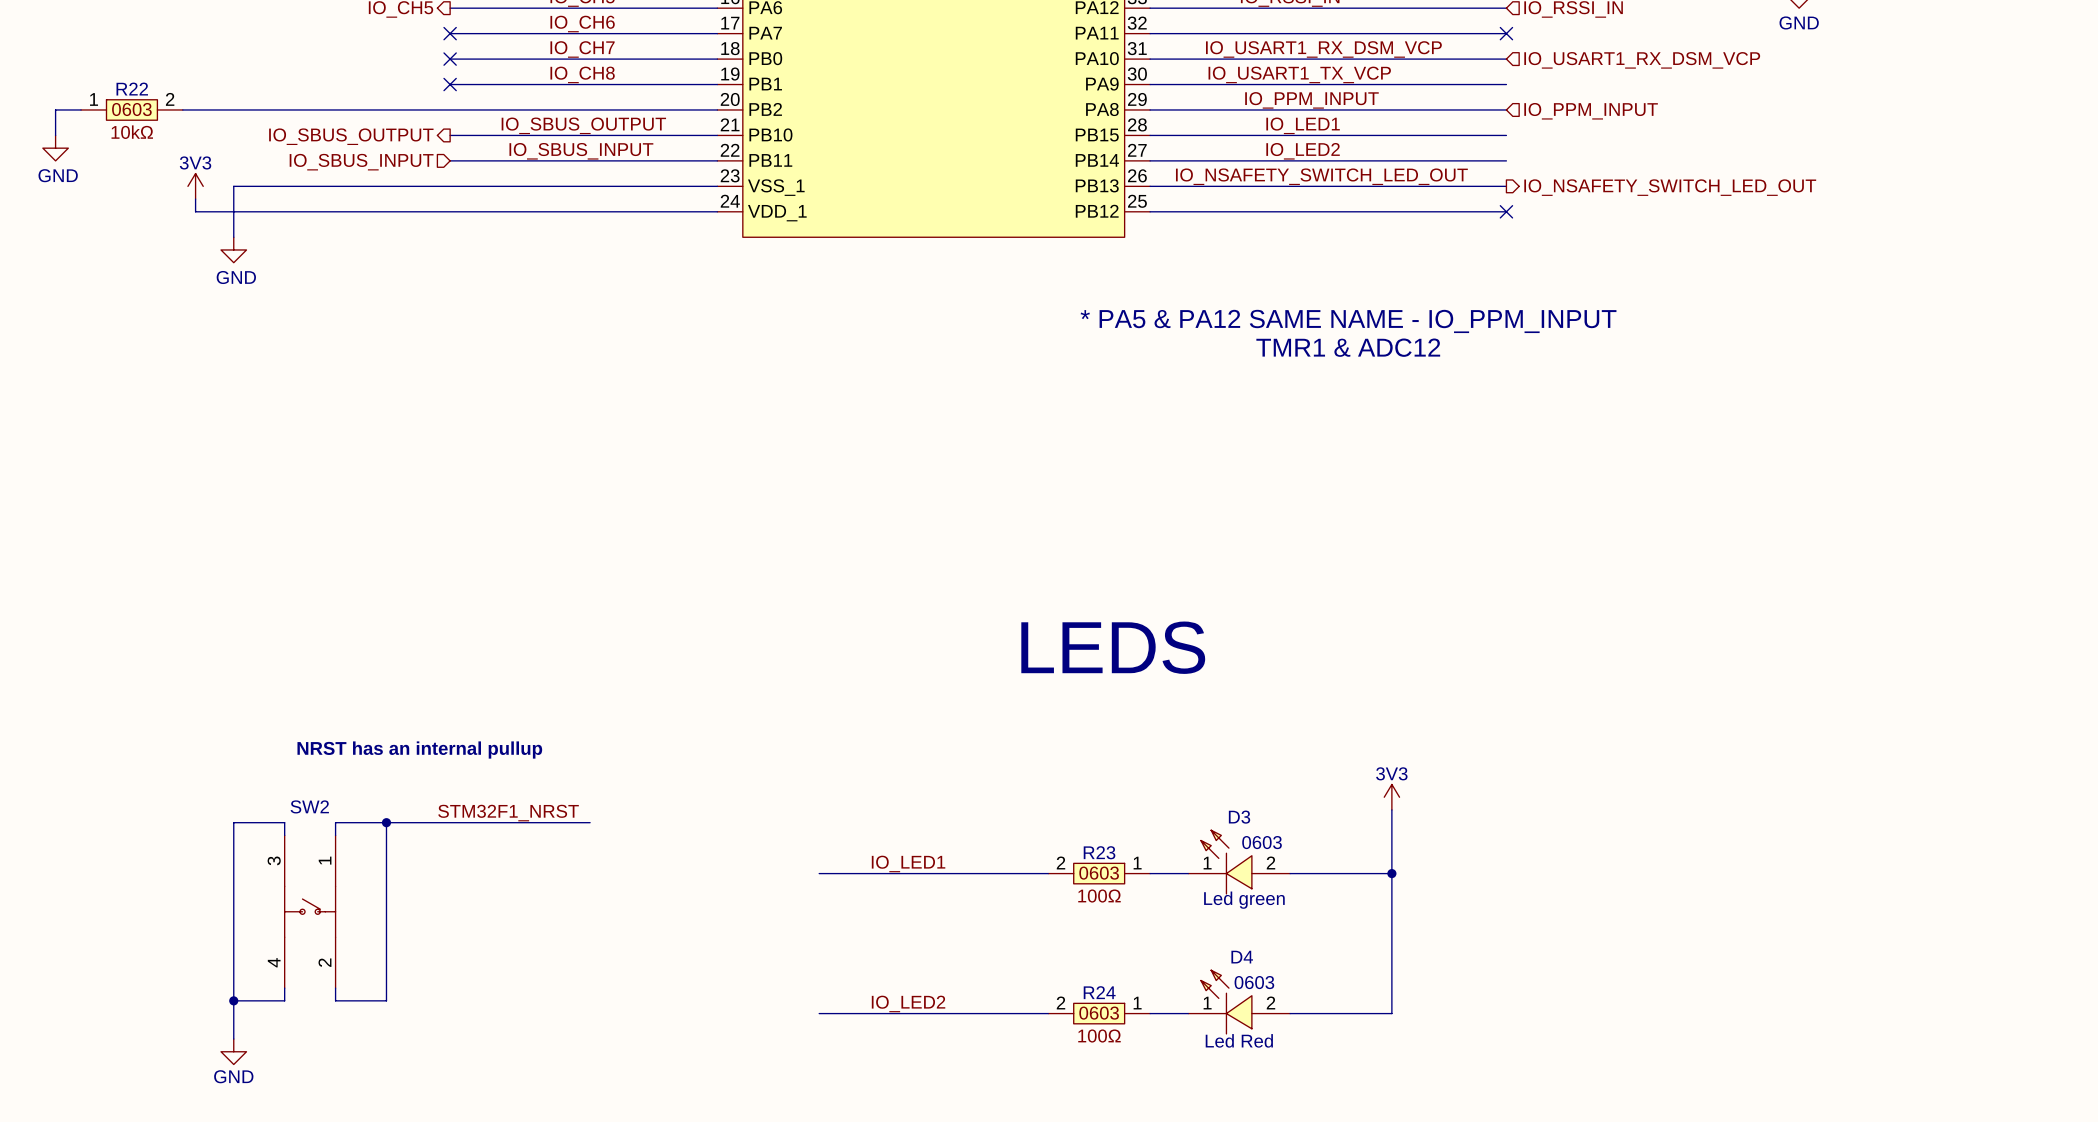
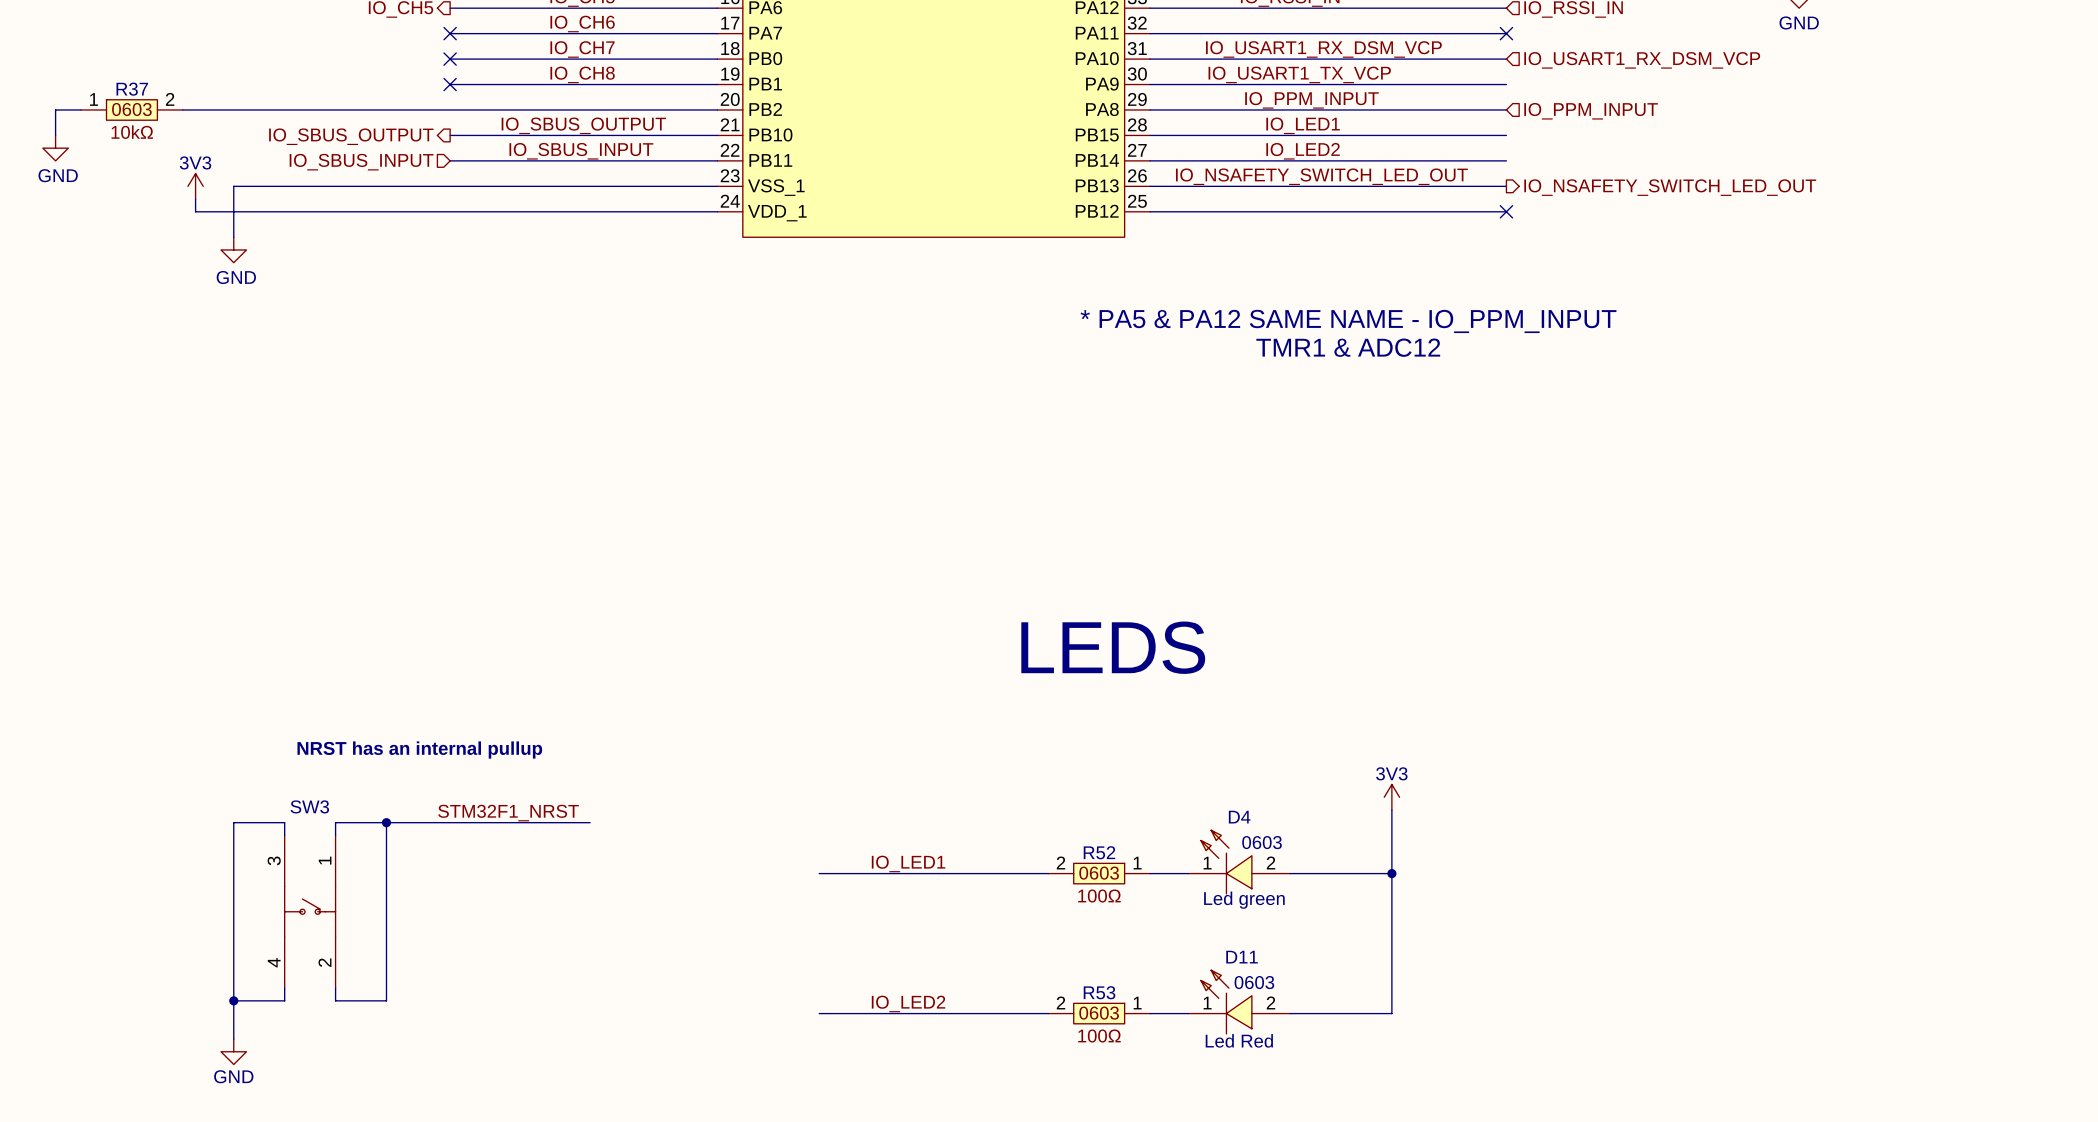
R22 name: R22 (132, 89) -> R37 (132, 89)
SW2 name: SW2 (309, 806) -> SW3 (309, 806)
D3 name: D3 (1239, 817) -> D4 (1239, 817)
R23 name: R23 (1099, 852) -> R52 (1099, 852)
D4 name: D4 (1242, 957) -> D11 (1242, 957)
R24 name: R24 (1099, 992) -> R53 (1099, 992)

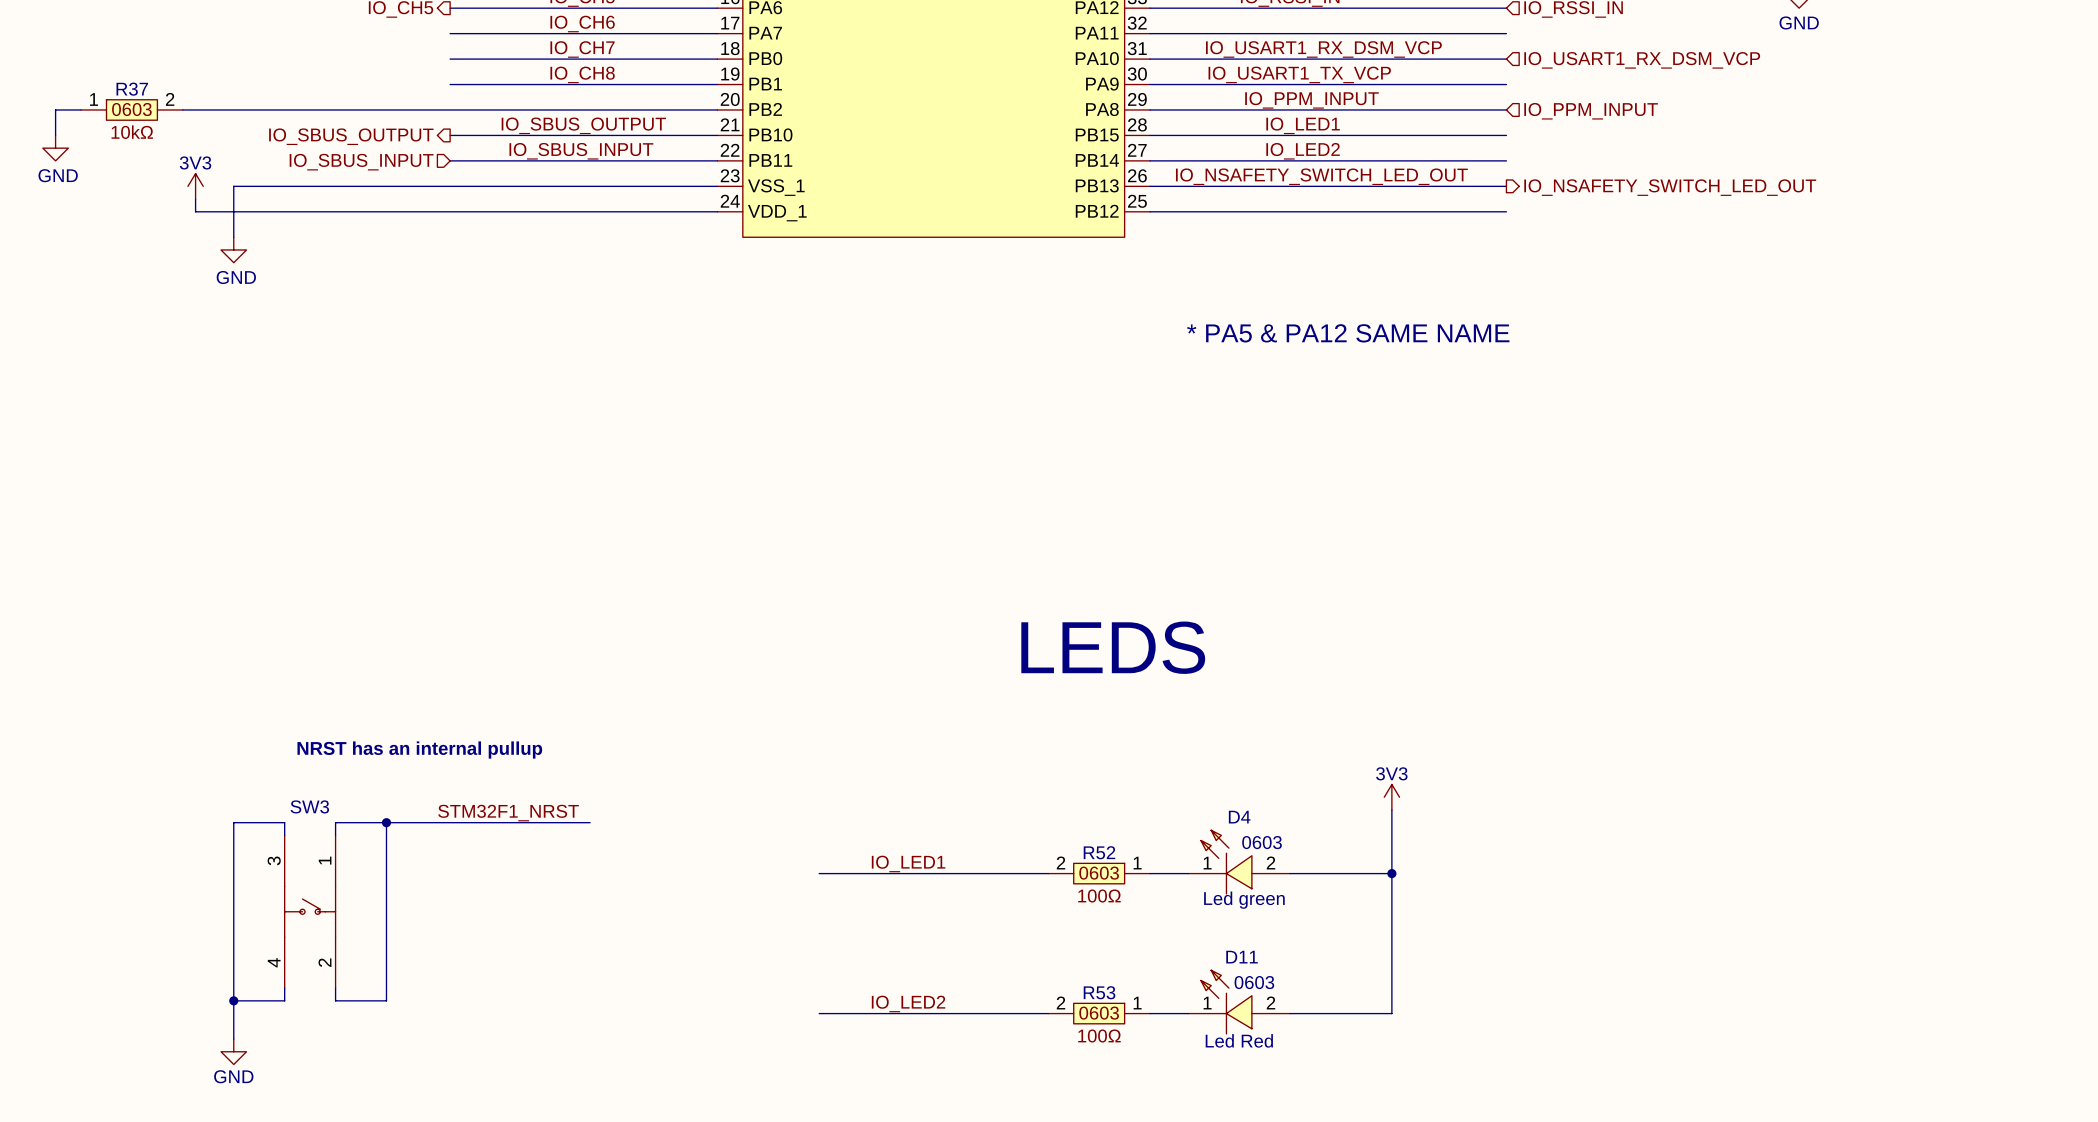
no-connect mark: (450, 33) -> none
no-connect mark: (1506, 33) -> none
no-connect mark: (450, 59) -> none
no-connect mark: (450, 84) -> none
no-connect mark: (1506, 211) -> none
text: * PA5 & PA12 SAME NAME - IO_PPM_INPUT (1348, 321) -> * PA5 & PA12 SAME NAME (1348, 333)
text: TMR1 & ADC12 (1348, 347) -> none

